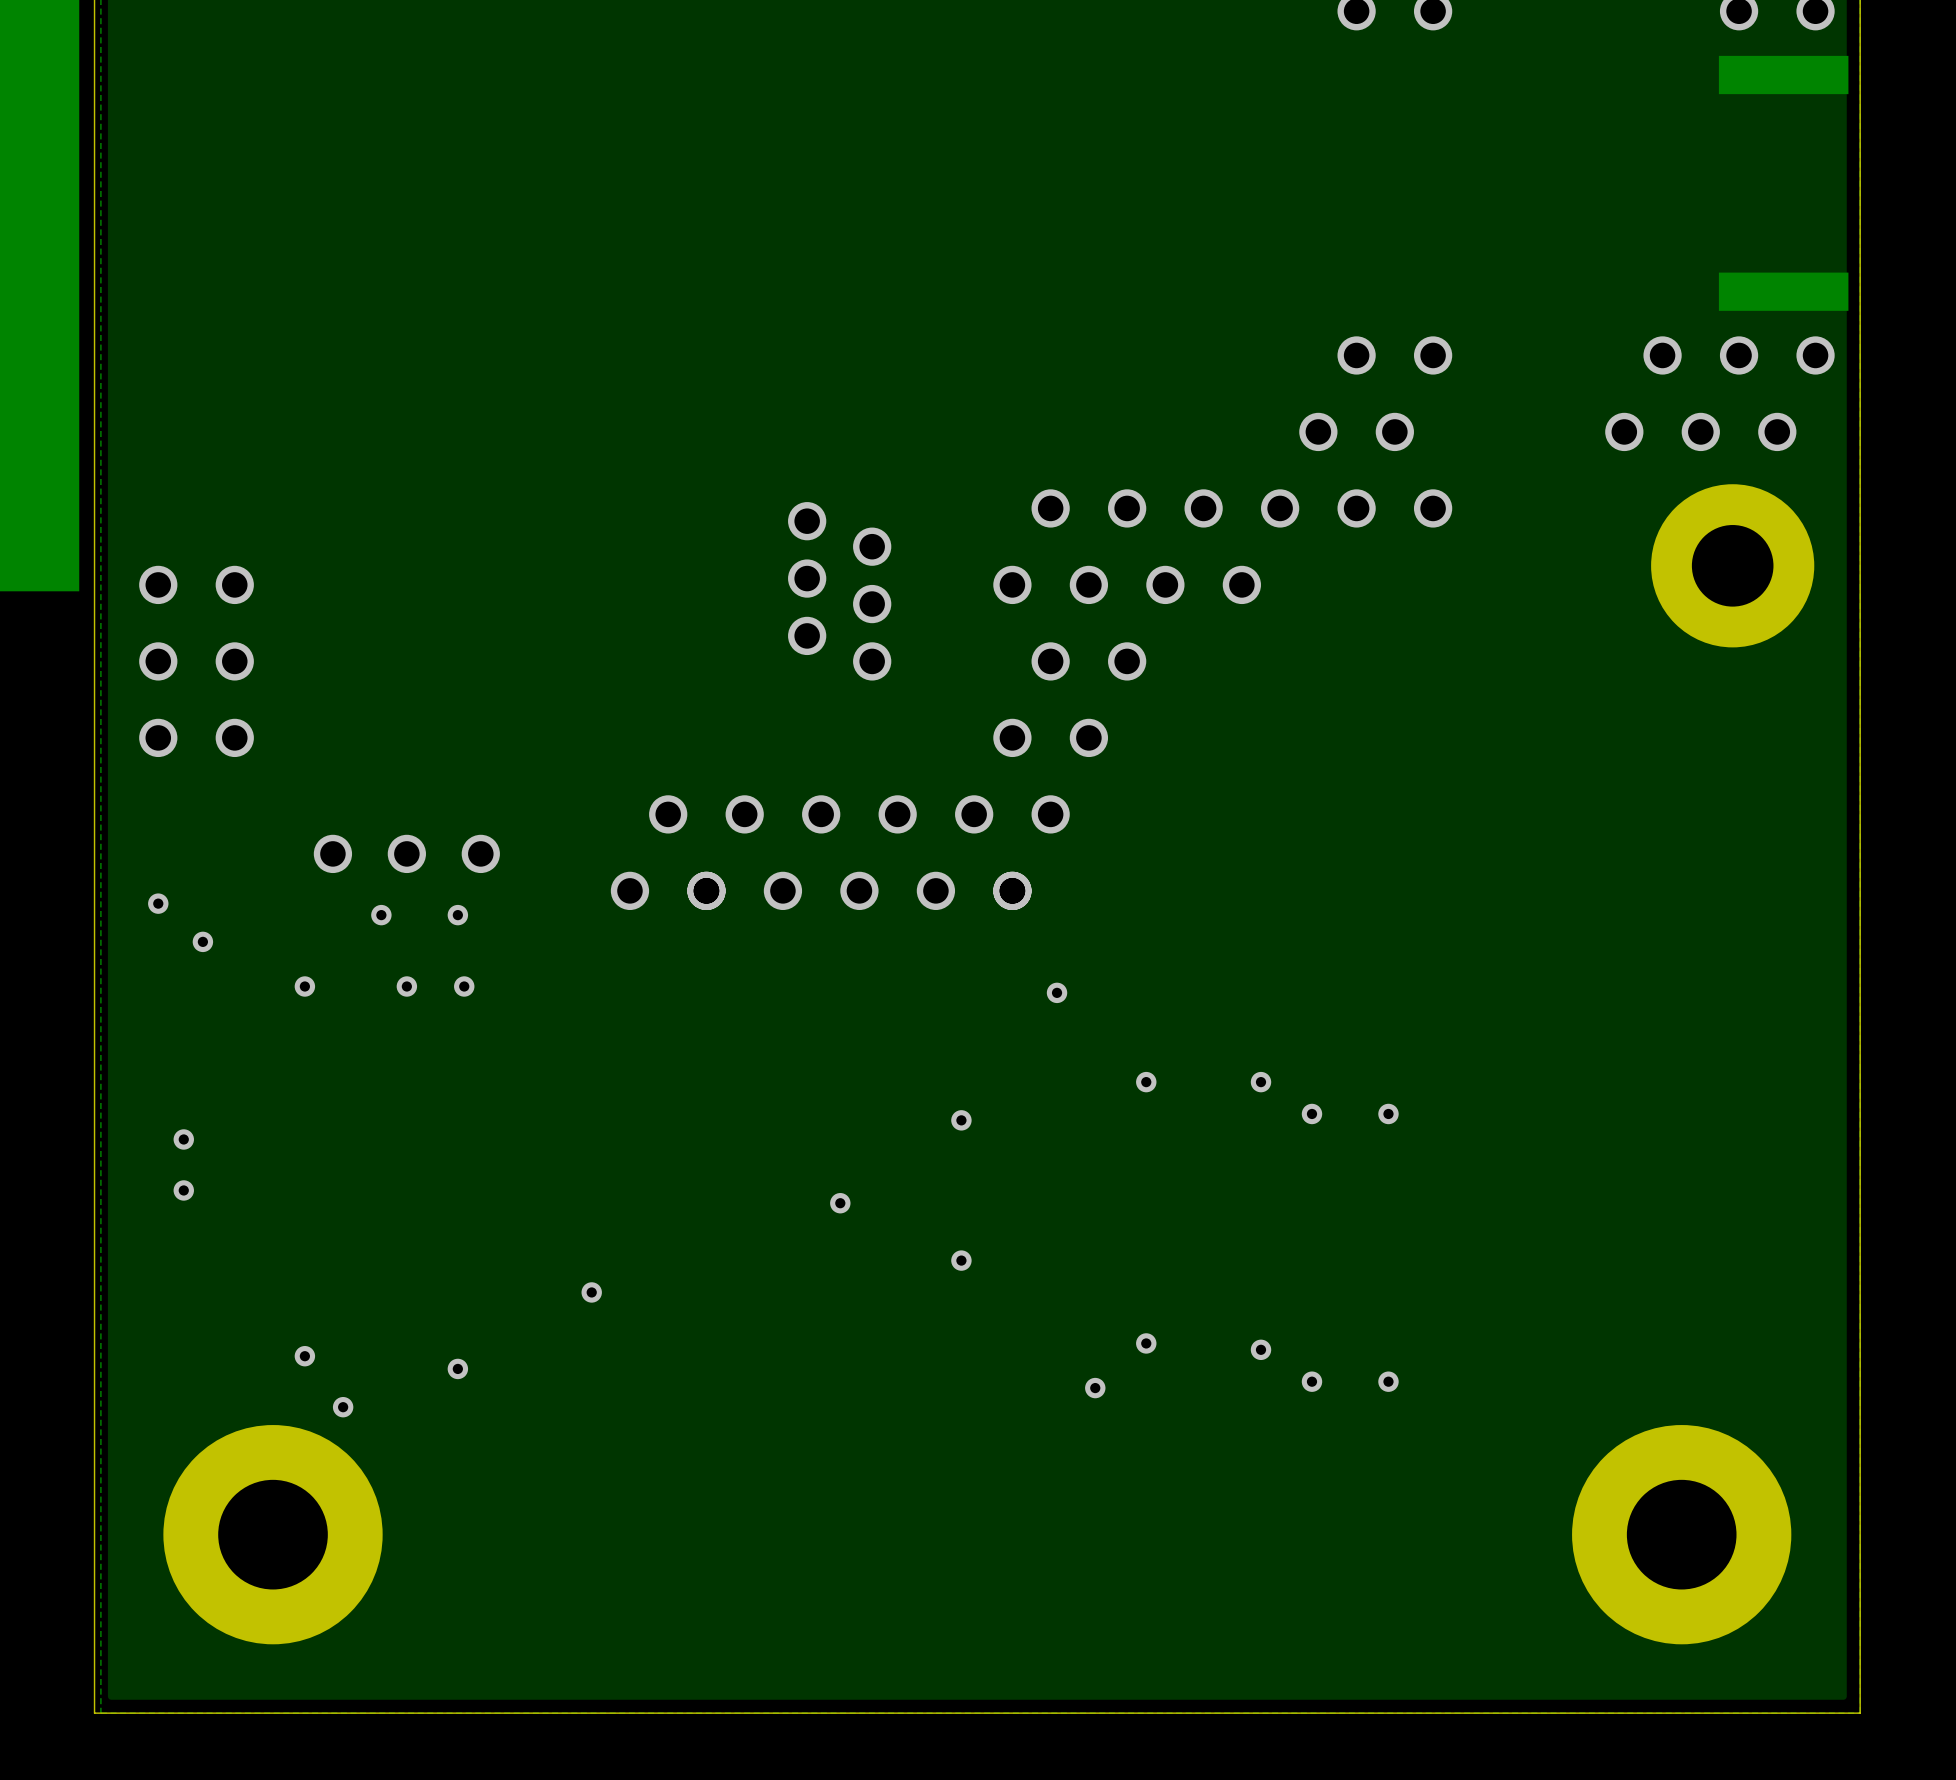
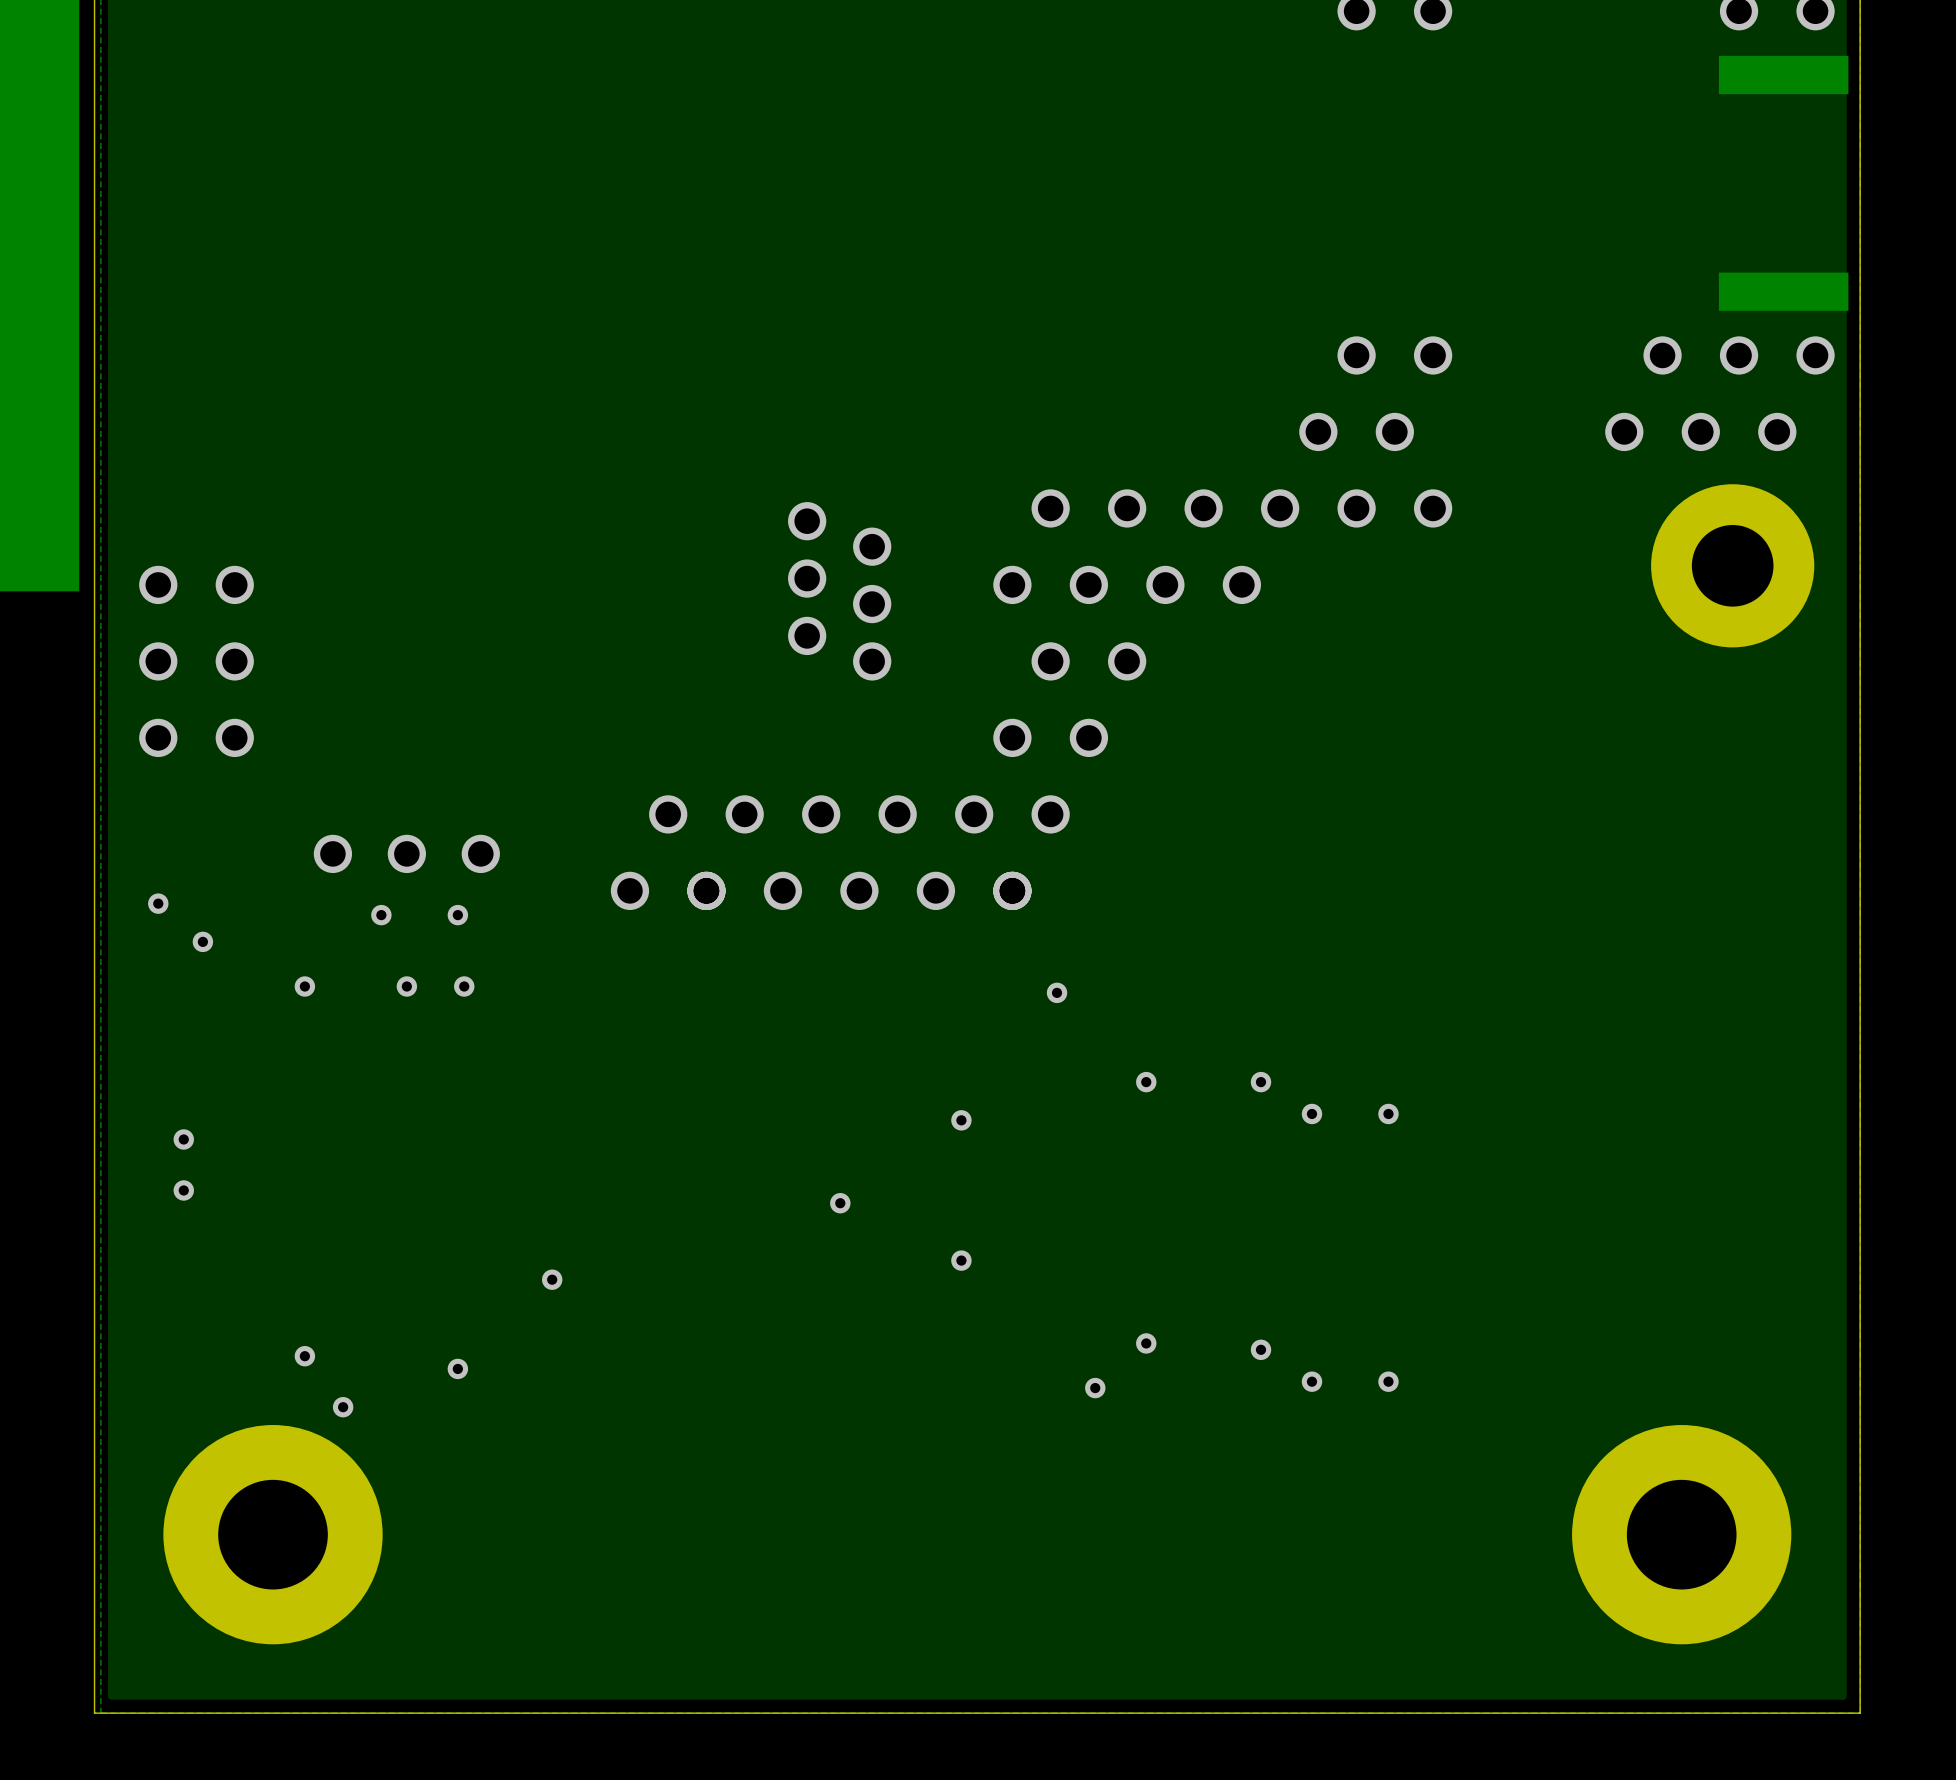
via position: (591, 1292) -> (552, 1279)

